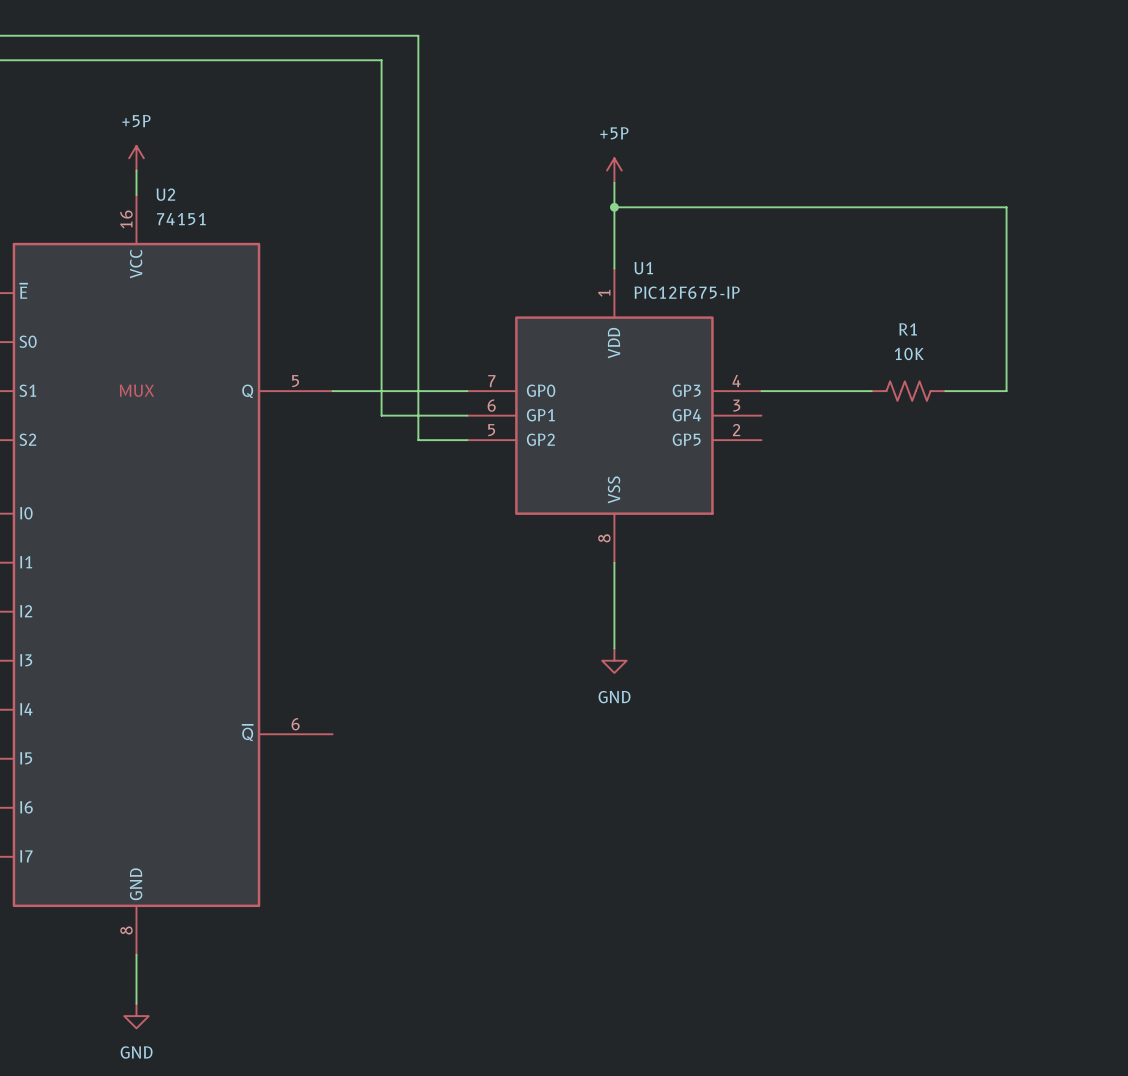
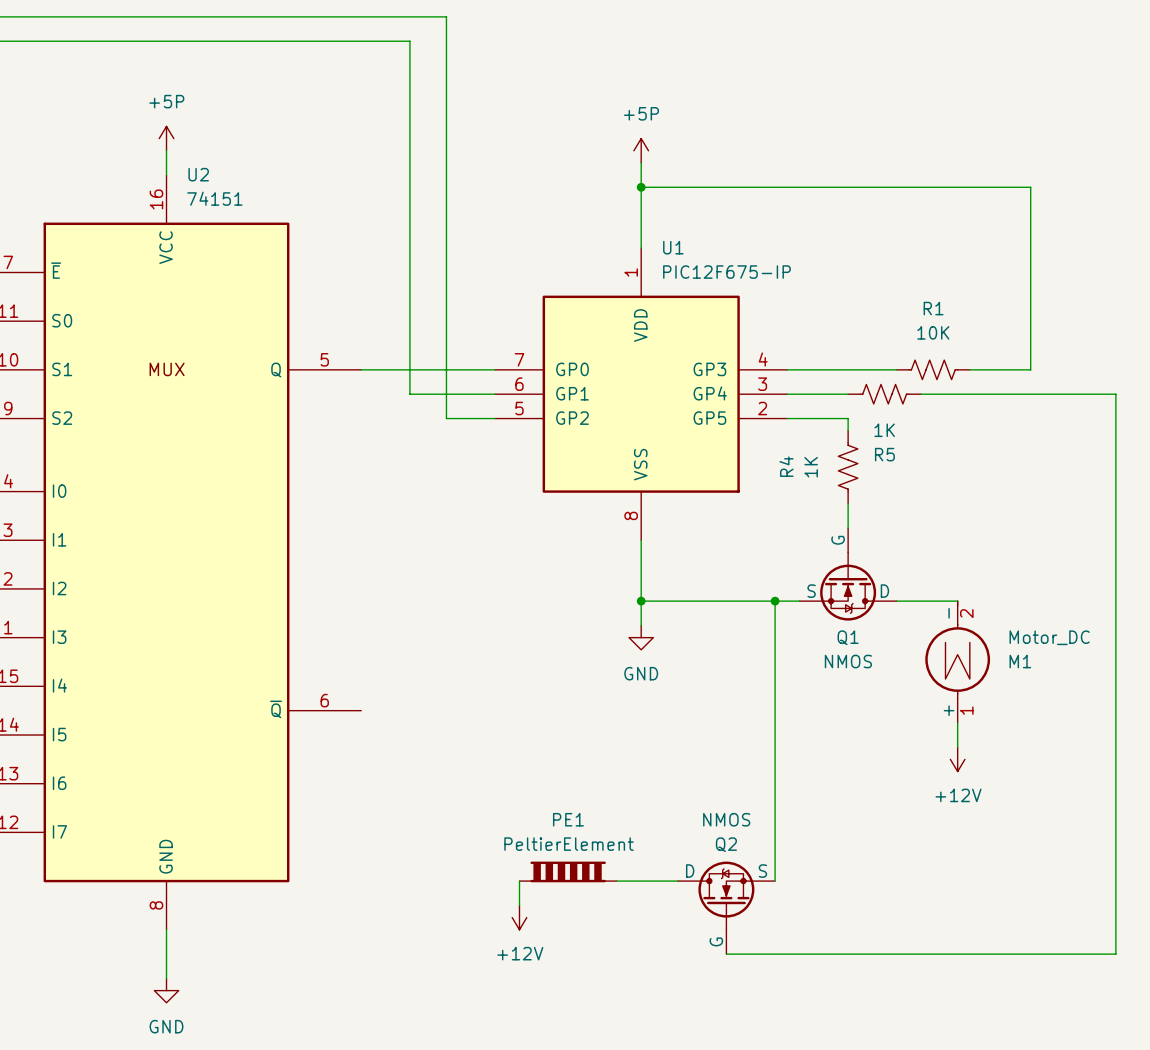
wire: none -> (787, 394) (848, 394)
R5: none -> 1K (884, 394)
wire: none -> (921, 394) (1115, 394) (1115, 954) (726, 954)
wire: none -> (787, 418) (848, 418) (848, 430)
R4: none -> 1K (848, 467)
wire: none -> (848, 503) (848, 528)
Q1: none -> NMOS (848, 574)
wire: none -> (641, 601) (799, 601)
junction: none -> (641, 601)
wire: none -> (775, 601) (775, 881)
junction: none -> (775, 601)
wire: none -> (896, 601) (957, 601)
M1: none -> Motor_DC (957, 661)
wire: none -> (957, 722) (957, 747)
power symbol: none -> +12V (957, 759)
PE1: none -> PeltierElement (568, 871)
wire: none -> (519, 881) (519, 905)
wire: none -> (616, 881) (677, 881)
Q2: none -> NMOS (726, 907)
power symbol: none -> +12V (519, 917)

